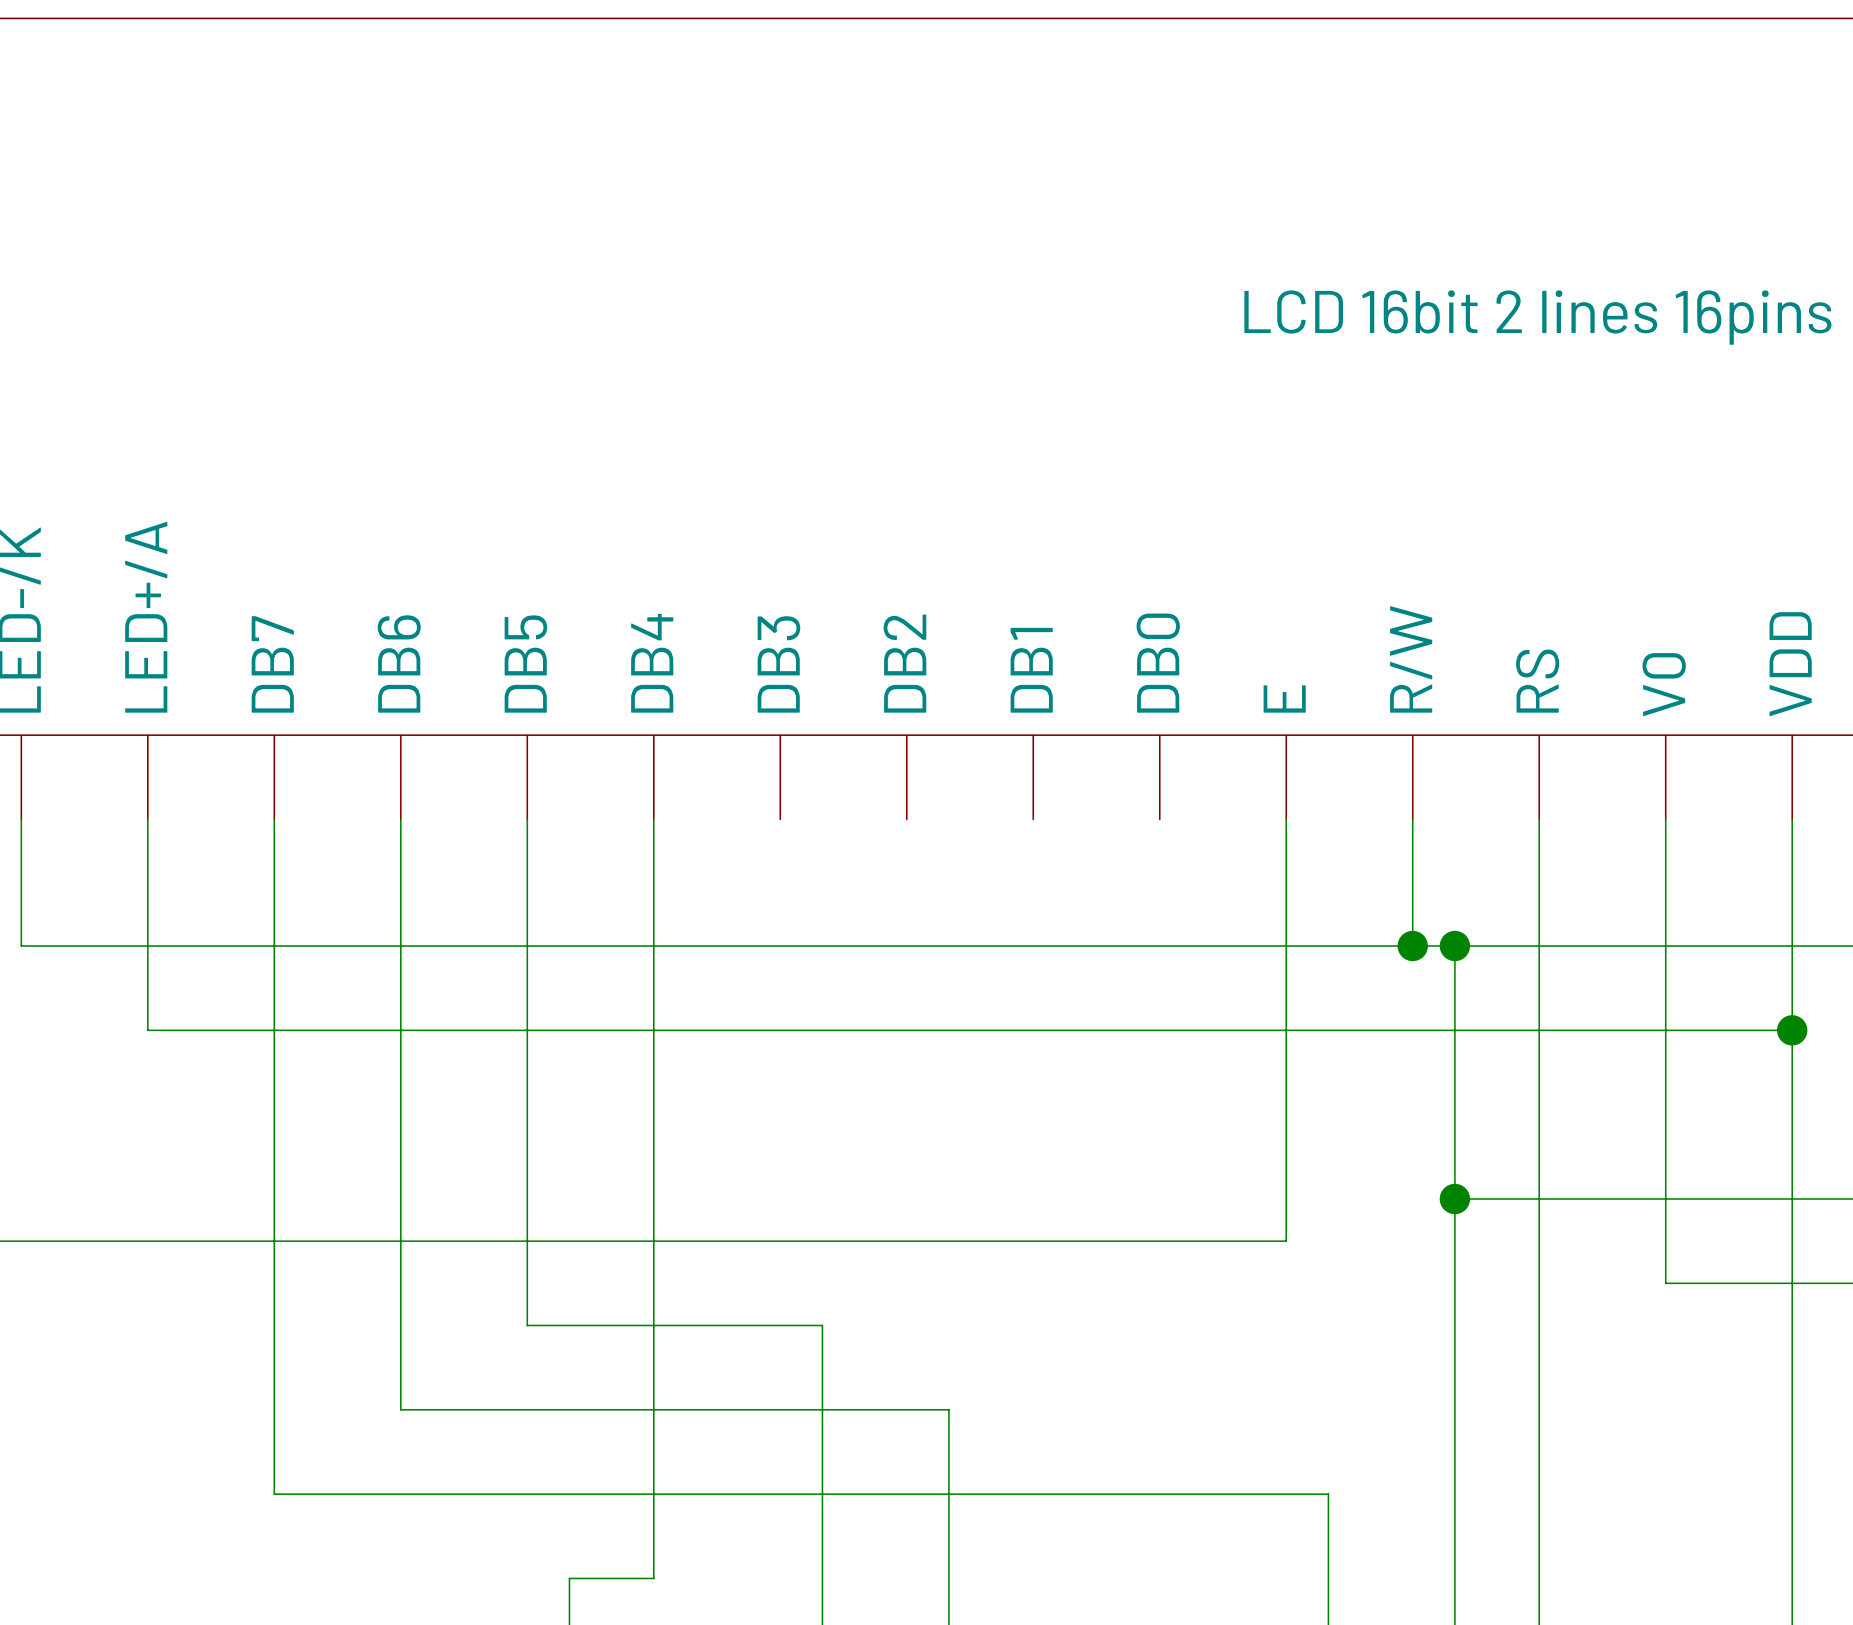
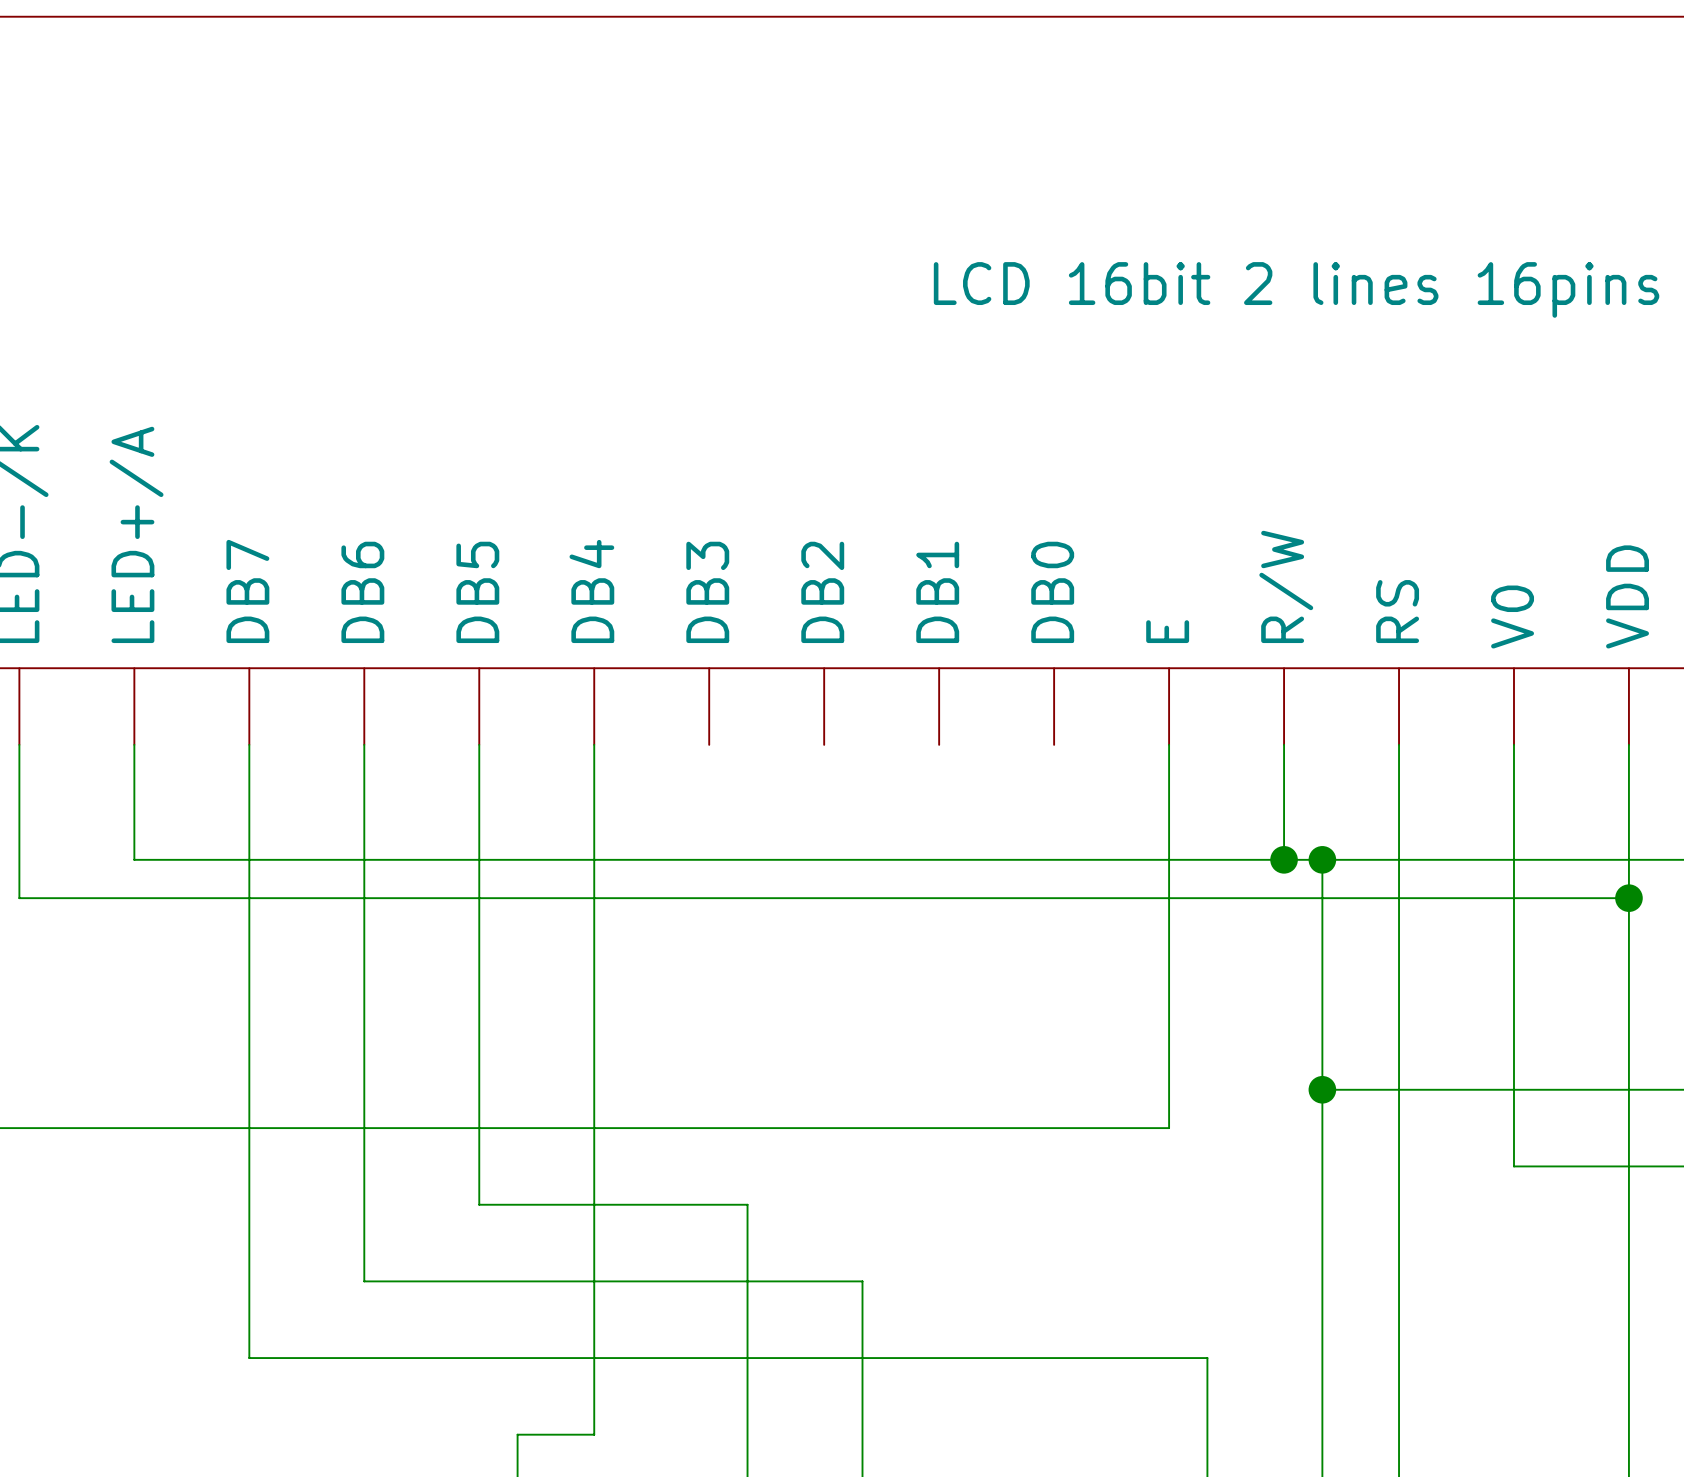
wire: (21, 946) (147, 946) (147, 1030) (1792, 1030) -> (19, 859) (19, 898) (1628, 898)
junction position: (1792, 1030) -> (1628, 898)

